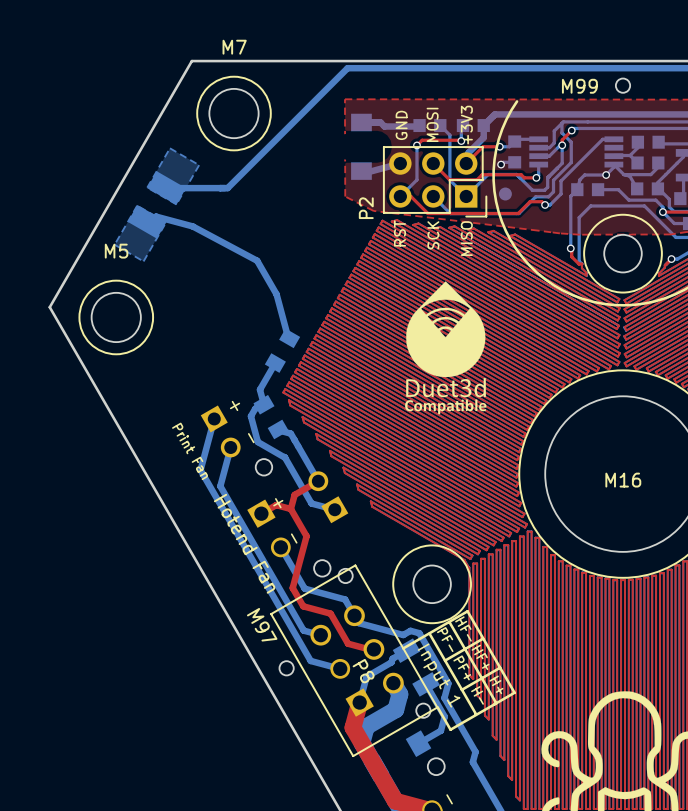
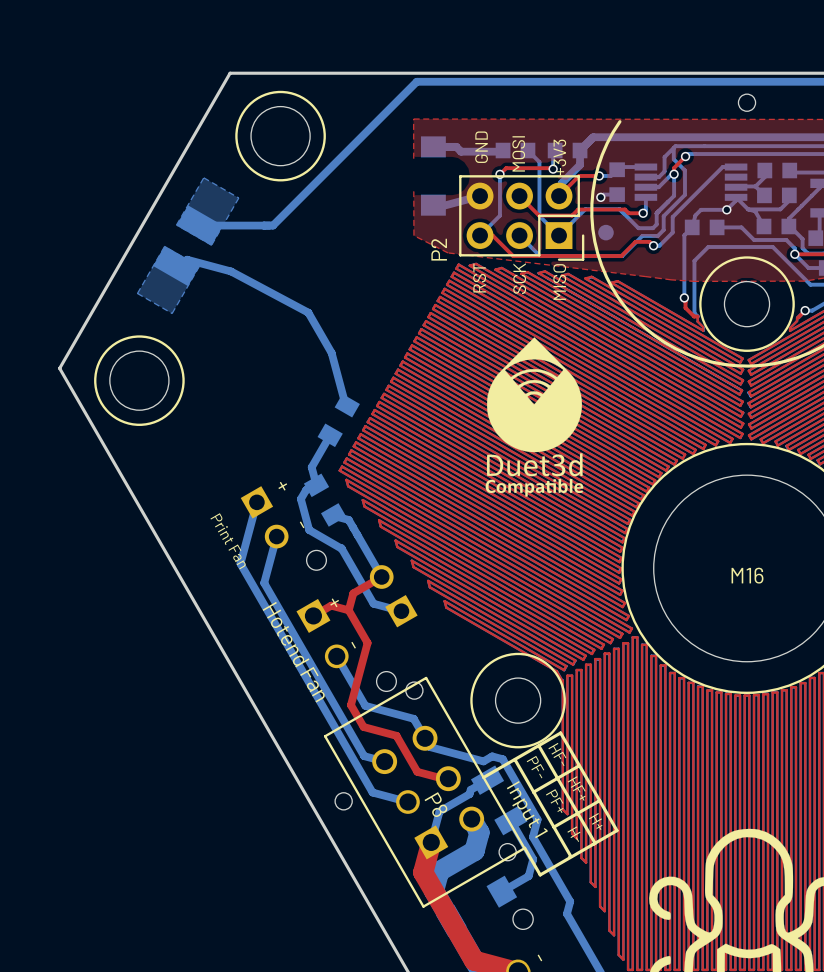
M7 name: M7 (234, 47) -> none
M99 name: M99 (579, 86) -> none
M5 name: M5 (116, 251) -> none
M97 name: M97 (262, 624) -> none

